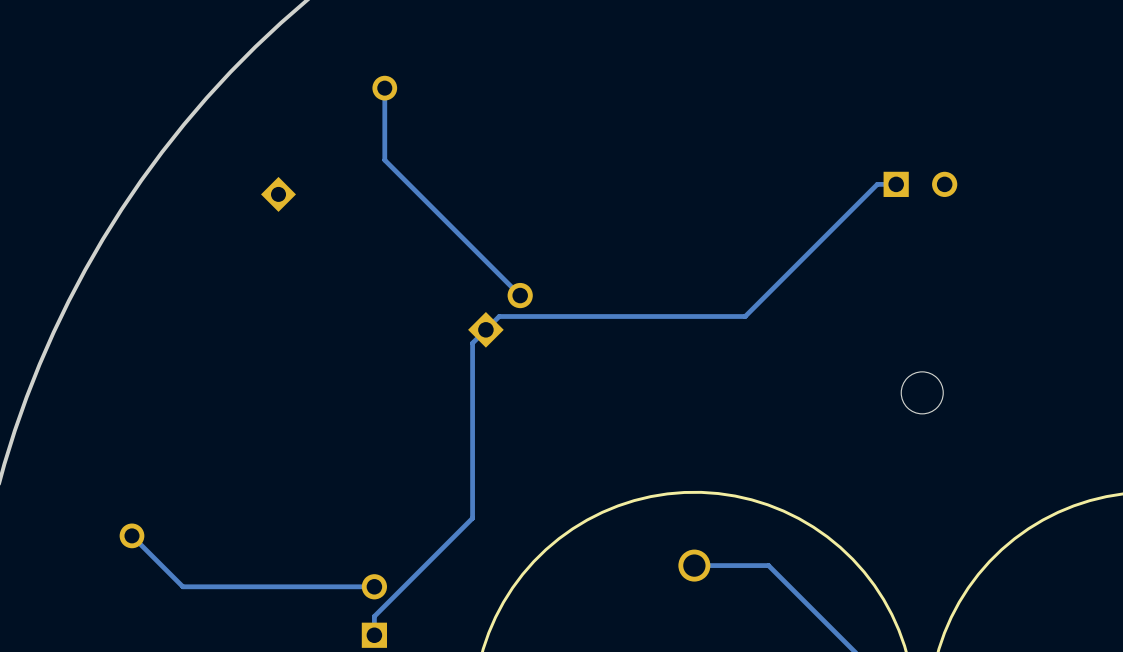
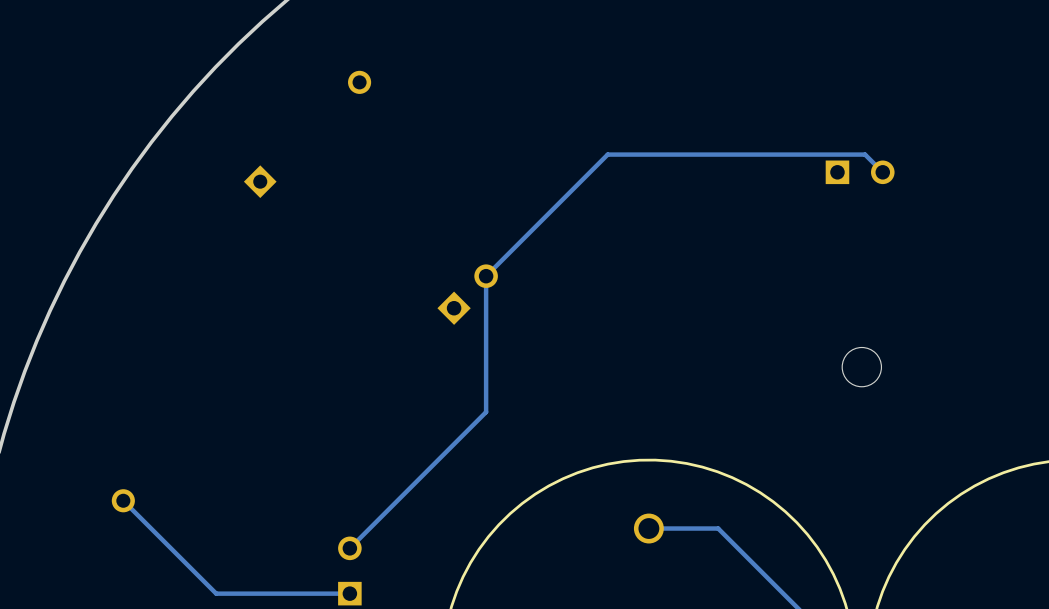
track: (384, 88) (384, 160) (520, 295) -> none
track: (896, 184) (877, 184) (745, 316) (499, 316) (472, 343) (472, 518) (374, 616) (374, 635) -> none
track: none -> (882, 172) (865, 154) (607, 154) (486, 276) (486, 412) (349, 548)
track: (374, 586) (182, 586) -> (349, 593) (216, 593) (170, 548)

